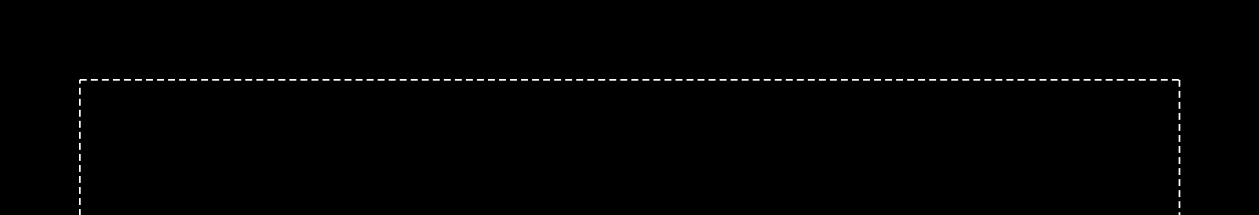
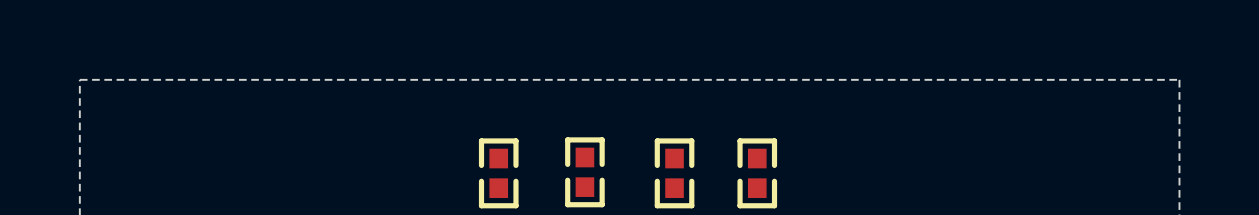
part: none -> (584, 172)
part: none -> (498, 173)
part: none -> (674, 173)
part: none -> (757, 173)

